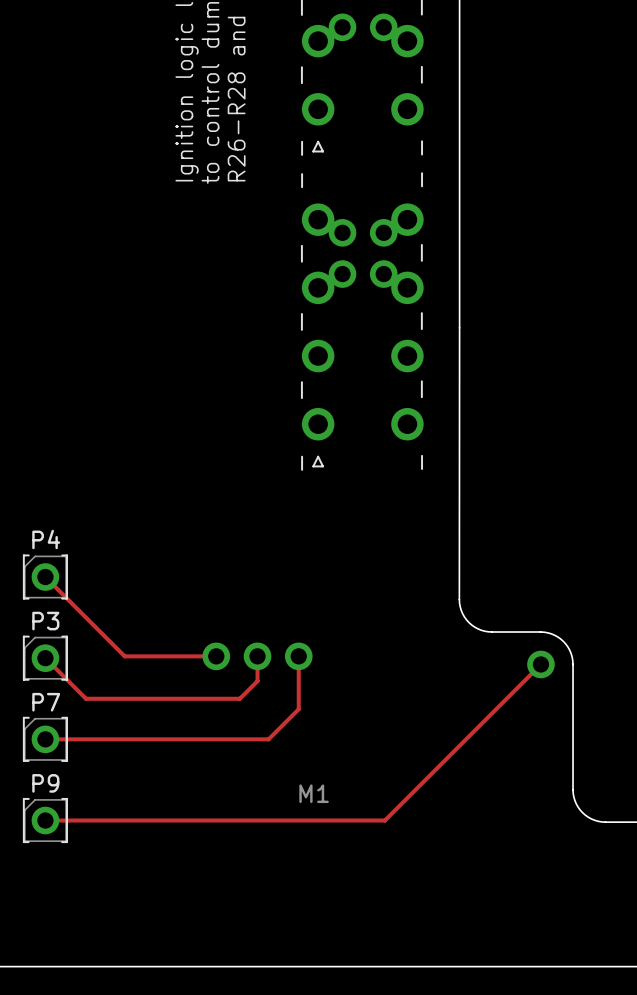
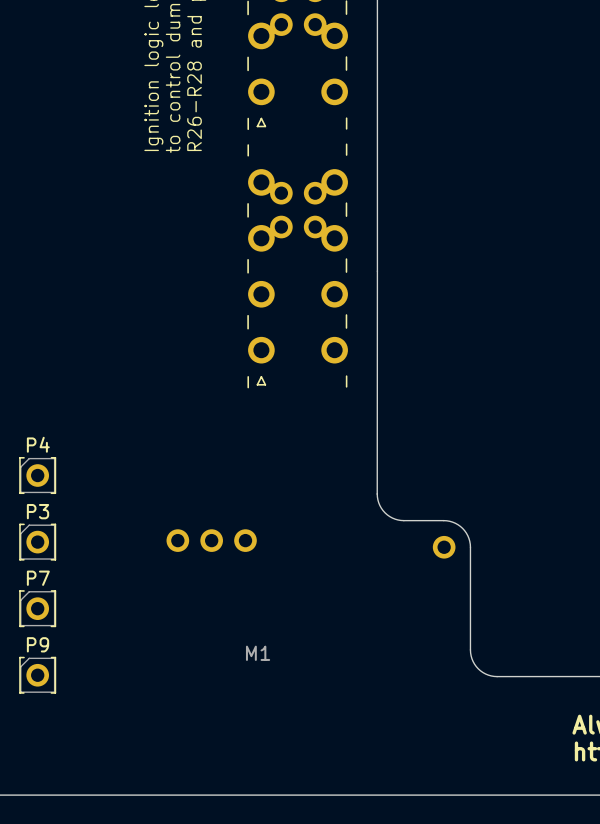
top track: (45, 577) (124, 656) (216, 656) -> none
top track: (257, 656) (257, 681) (239, 698) (86, 698) (45, 658) -> none
top track: (298, 656) (298, 709) (268, 739) (45, 739) -> none
top track: (540, 664) (384, 820) (45, 820) -> none

